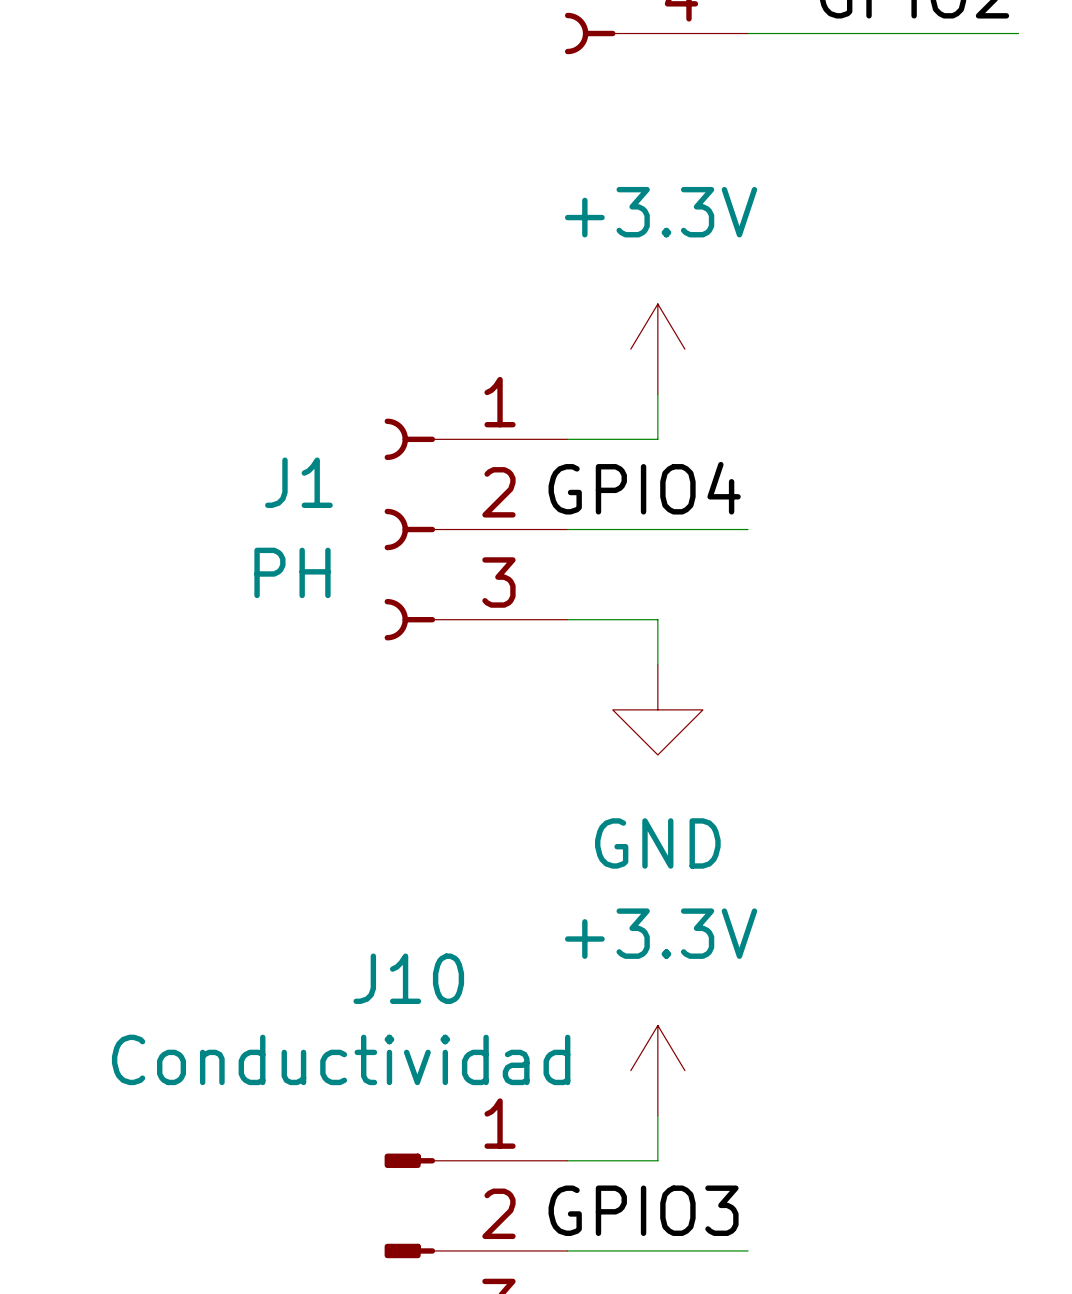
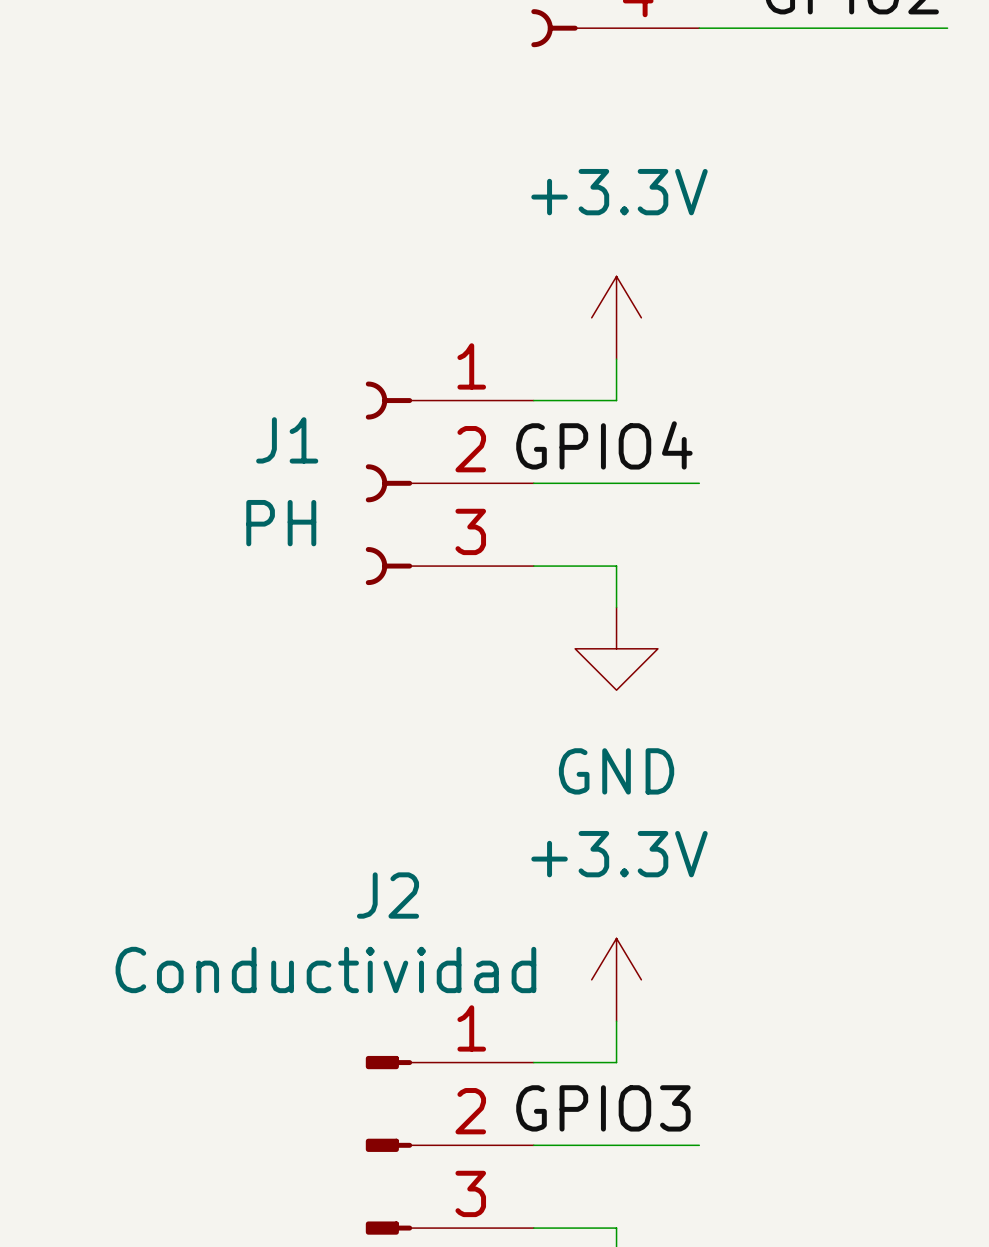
J10 name: J10 (408, 978) -> J2 (387, 895)

